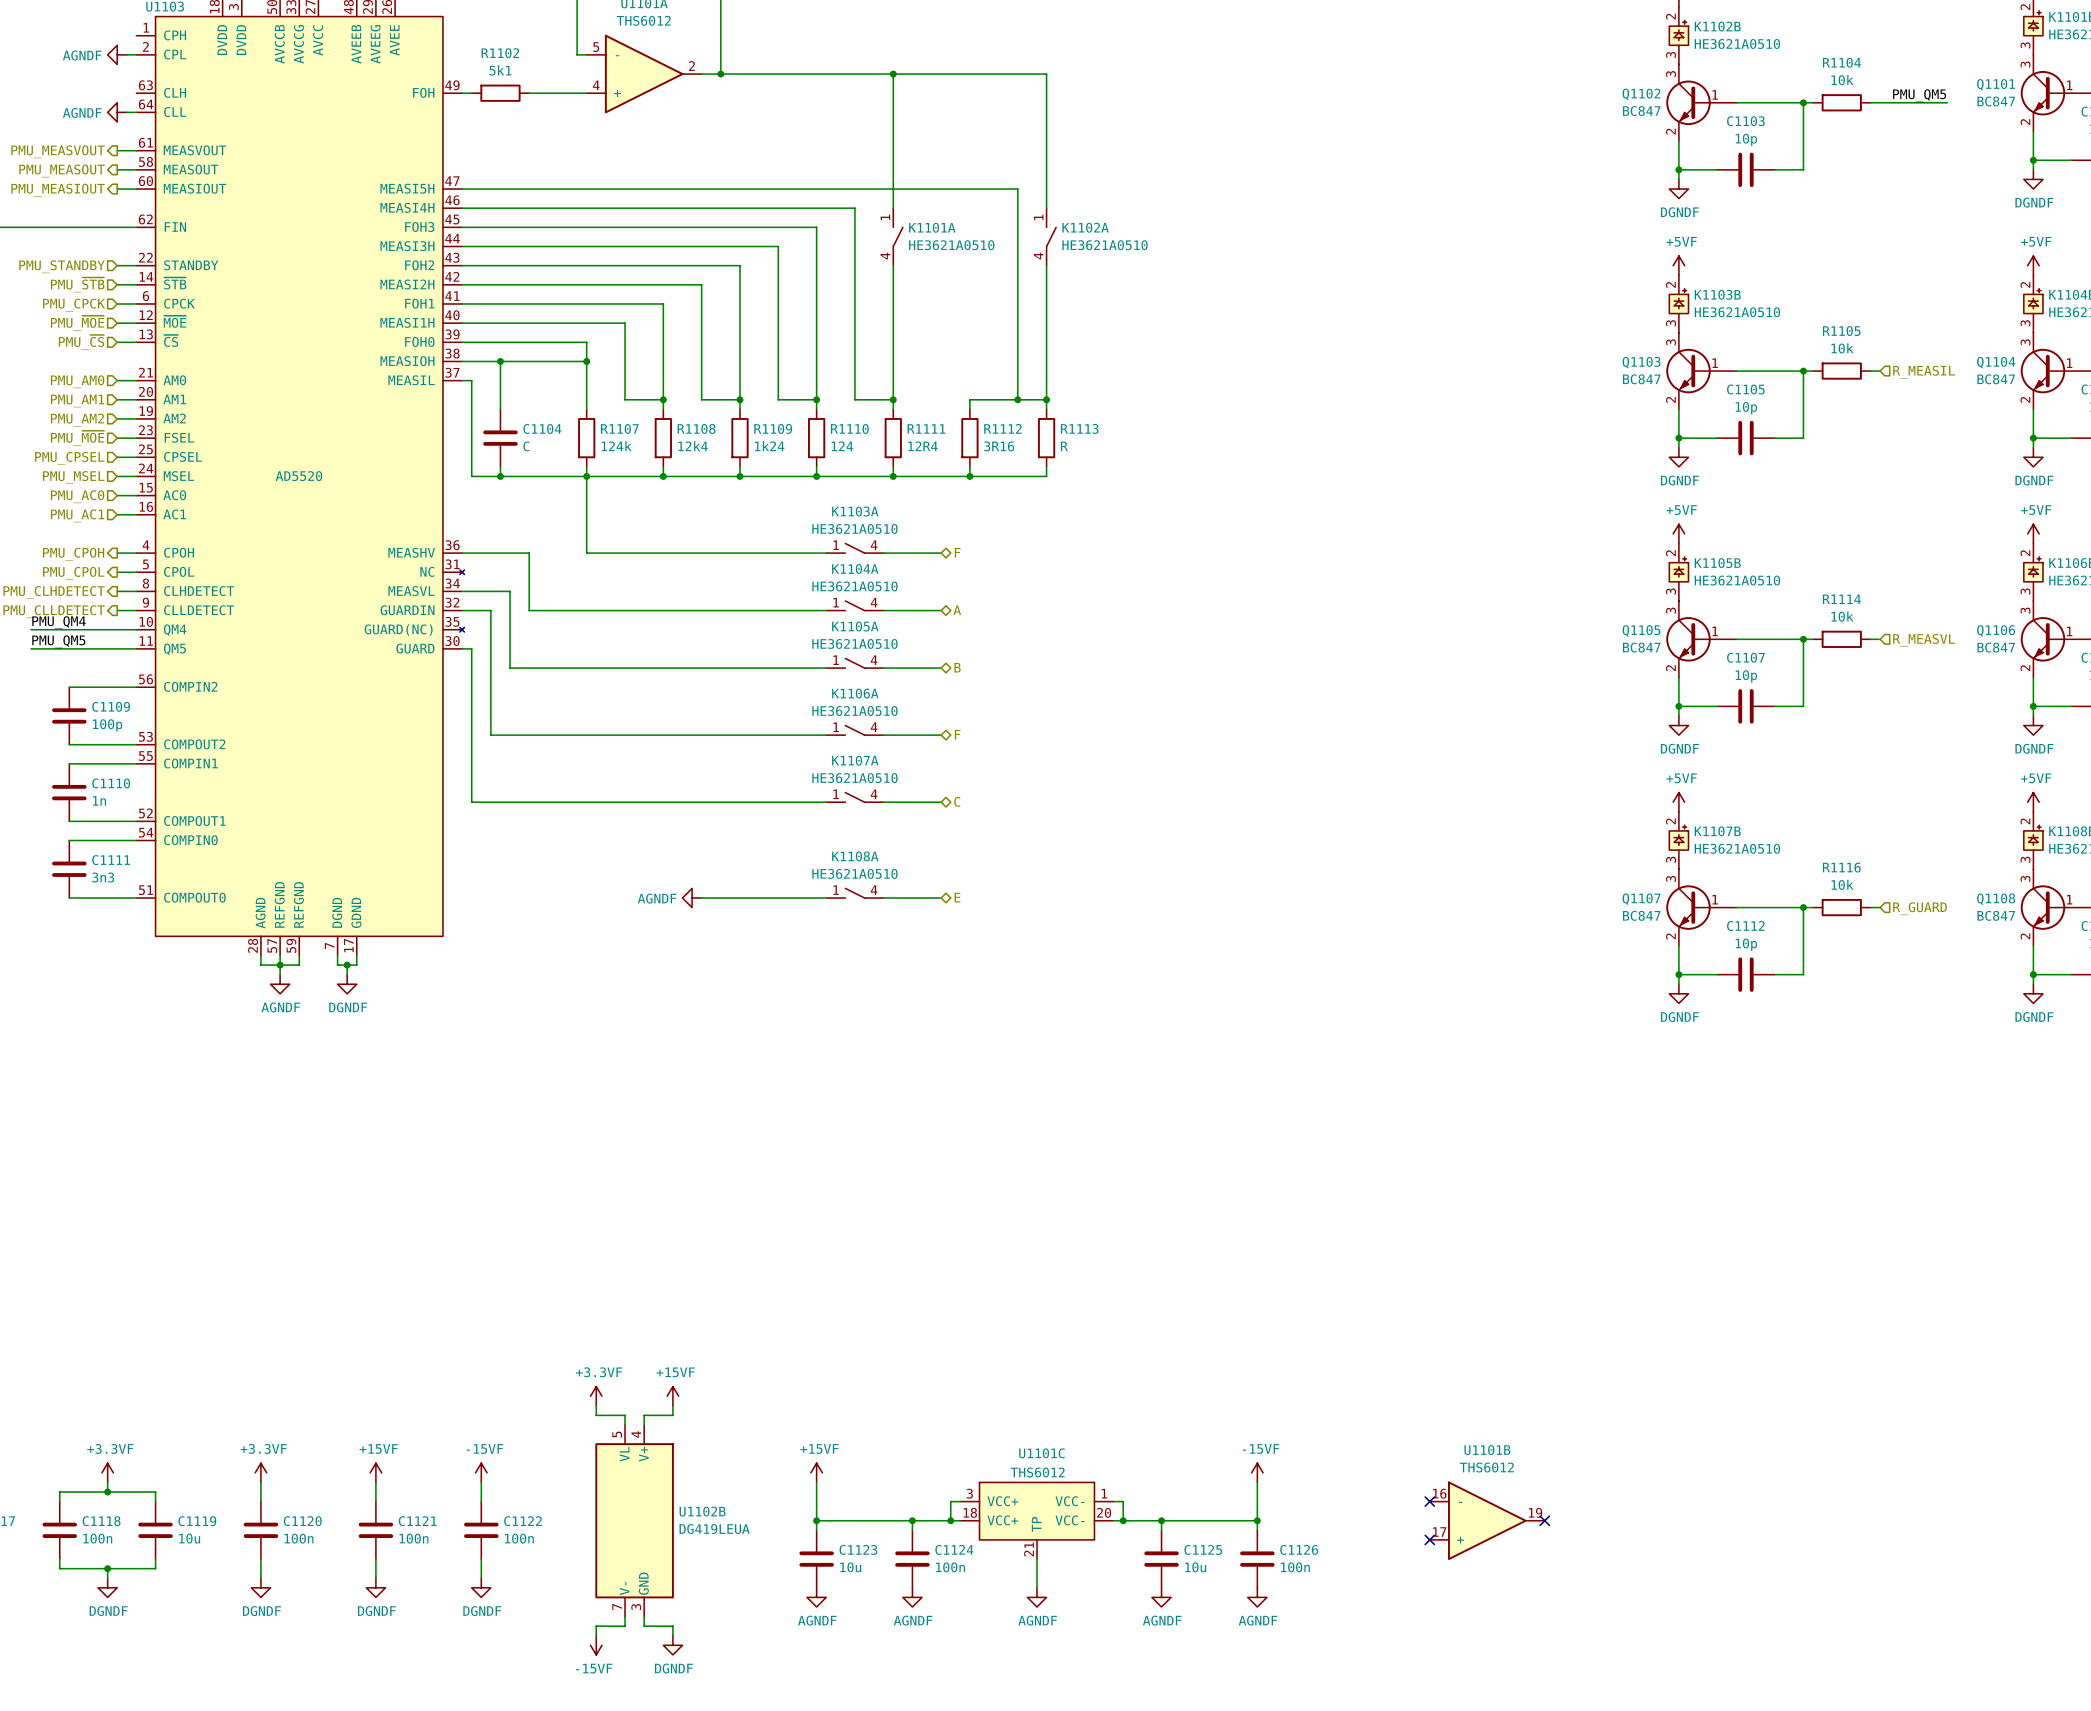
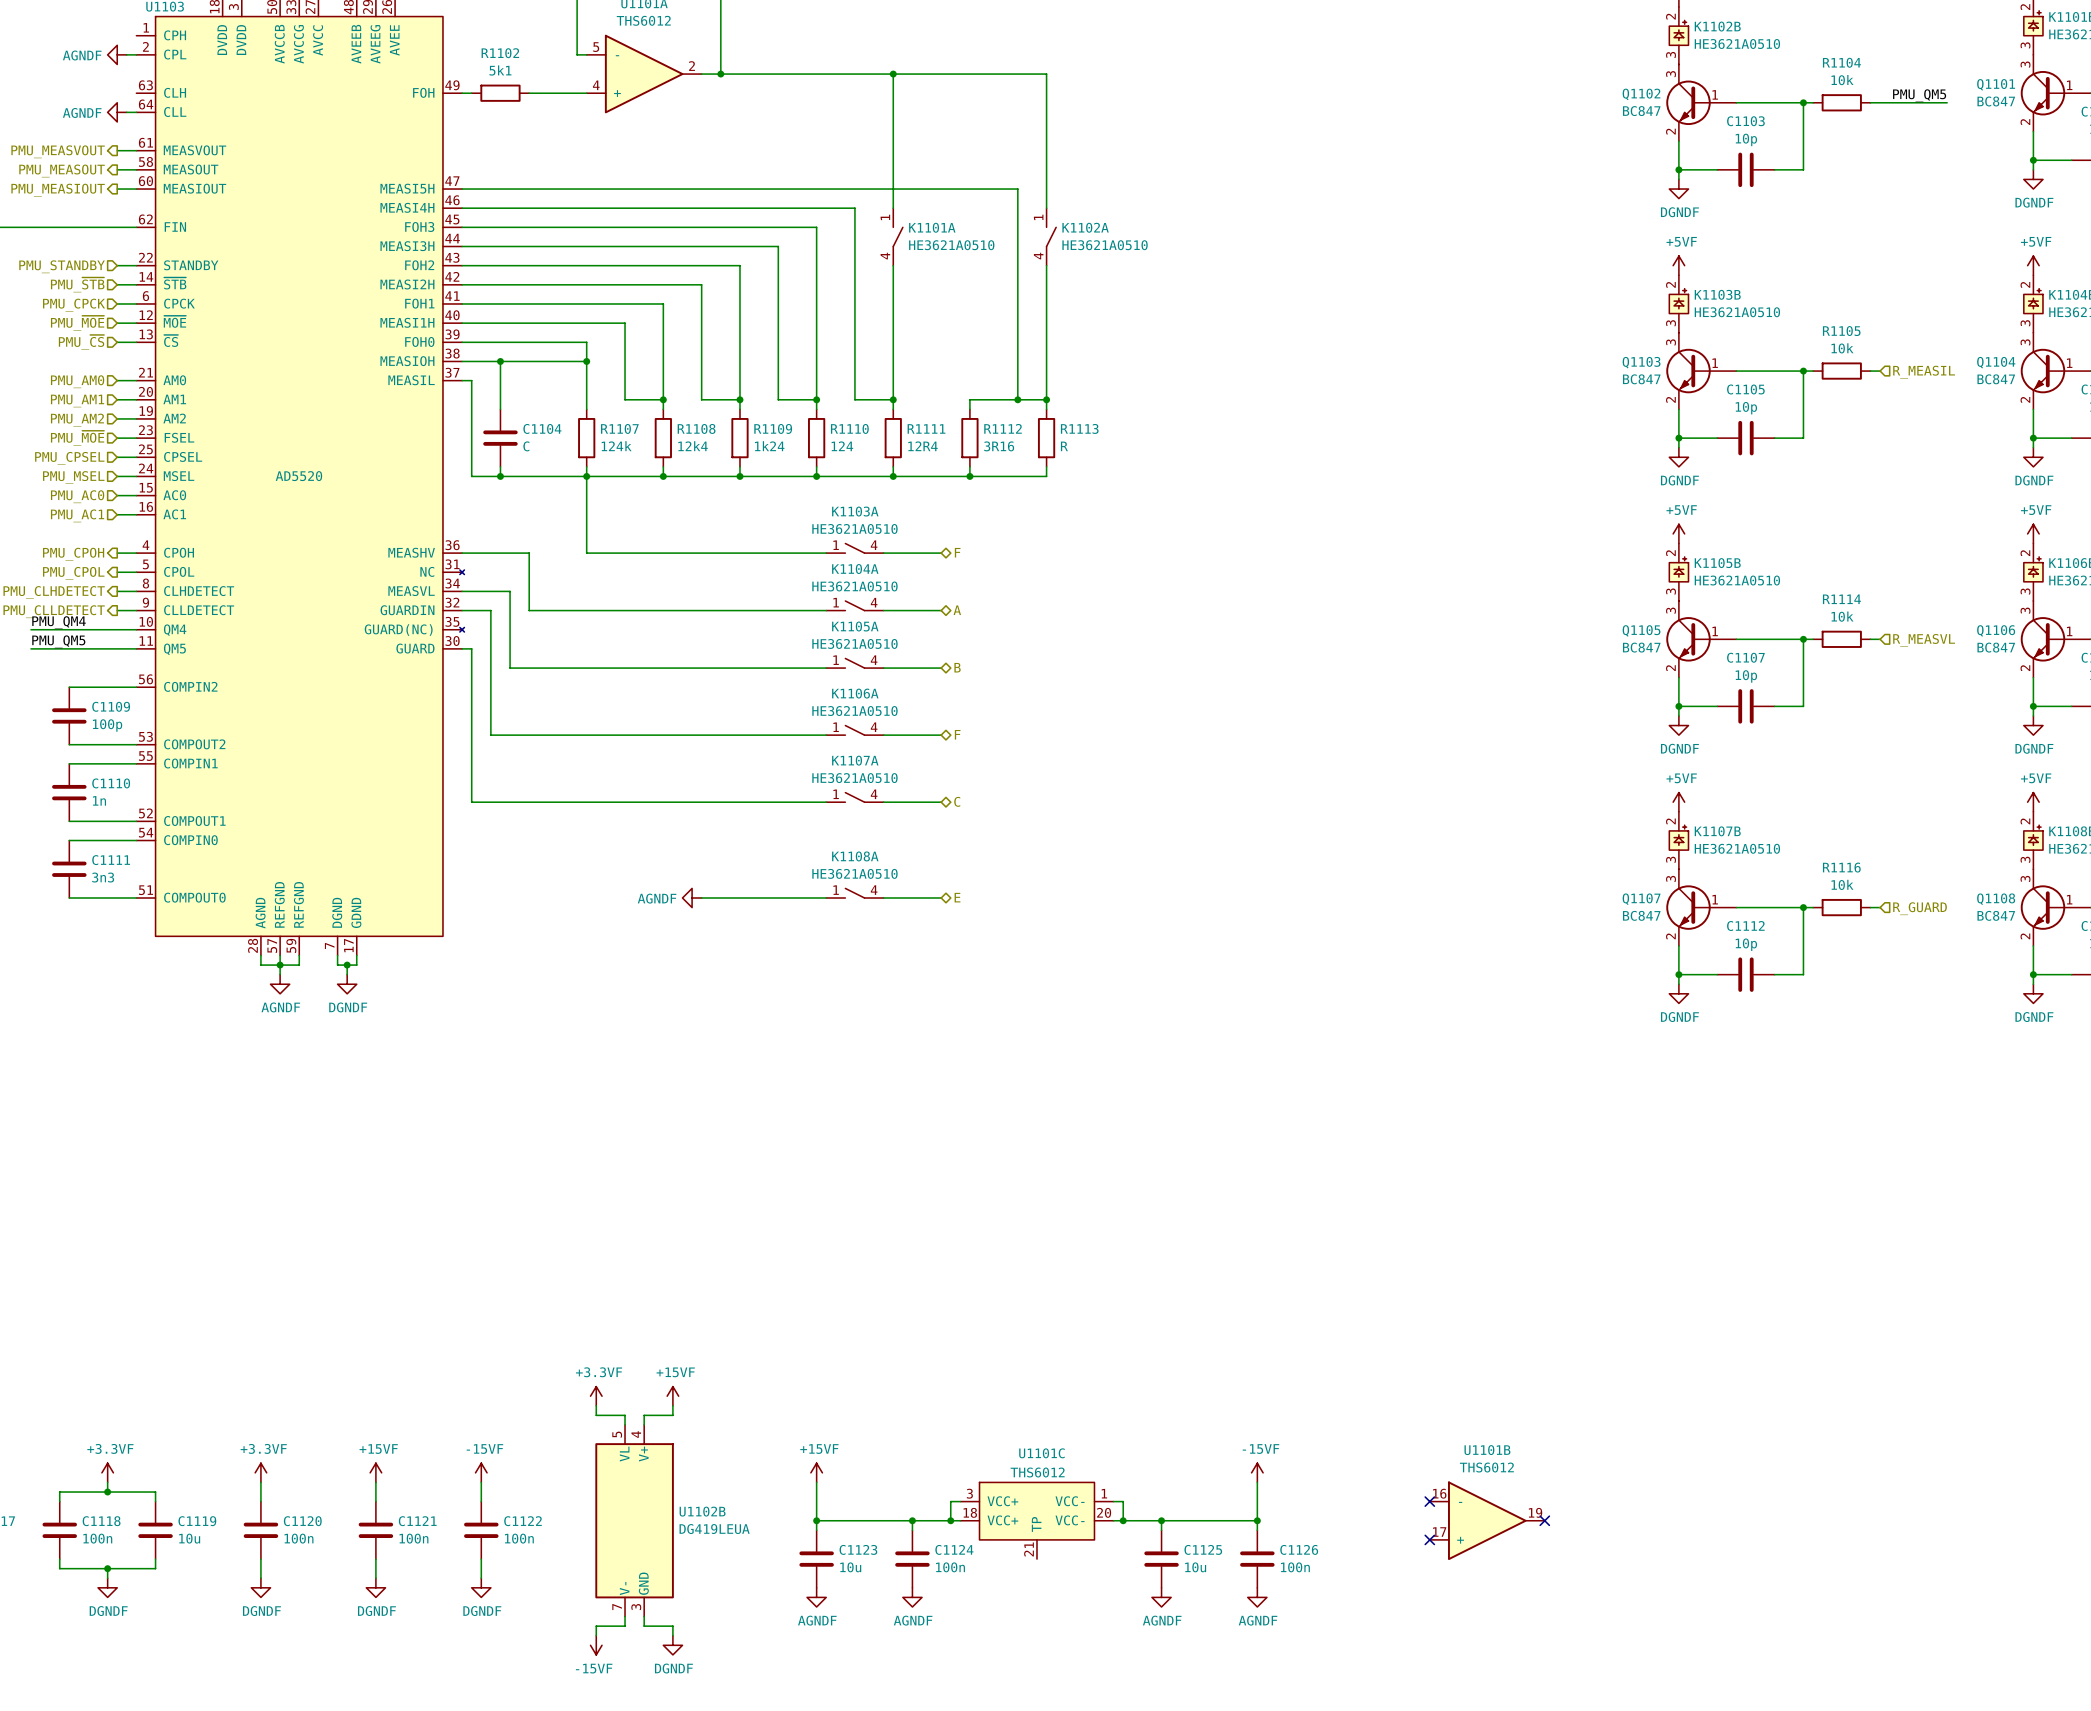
wire: (1036, 1559) (1036, 1587) -> none
power symbol: AGNDF (1036, 1597) -> none

